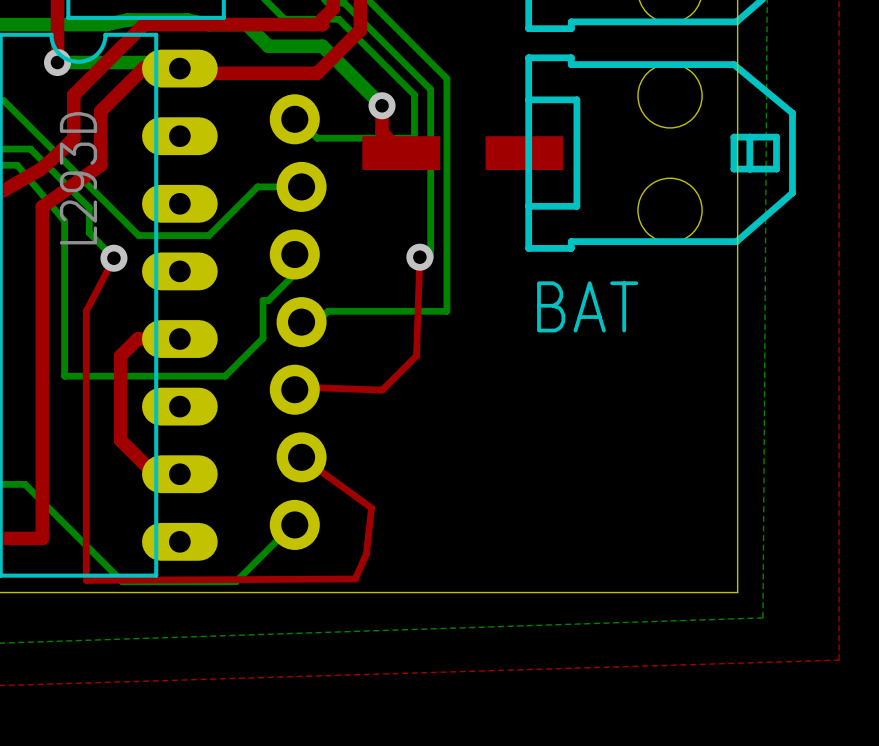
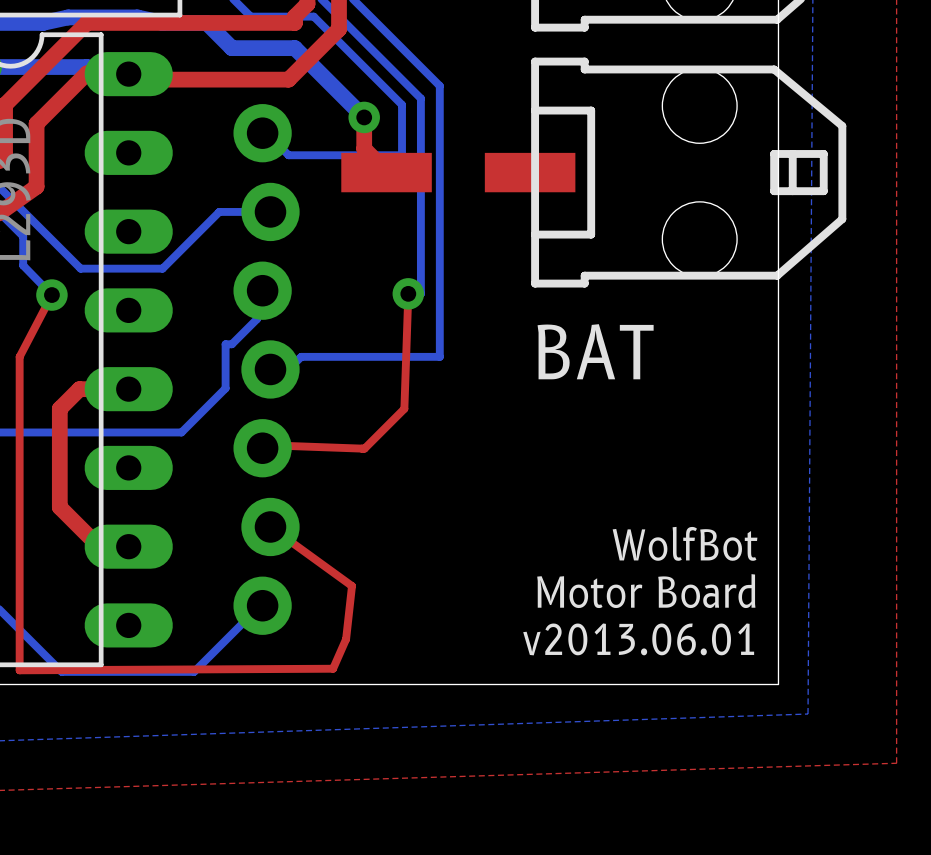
text: none -> WolfBot (685, 543)
text: none -> Motor Board (646, 591)
text: none -> v2013.06.01 (638, 639)

